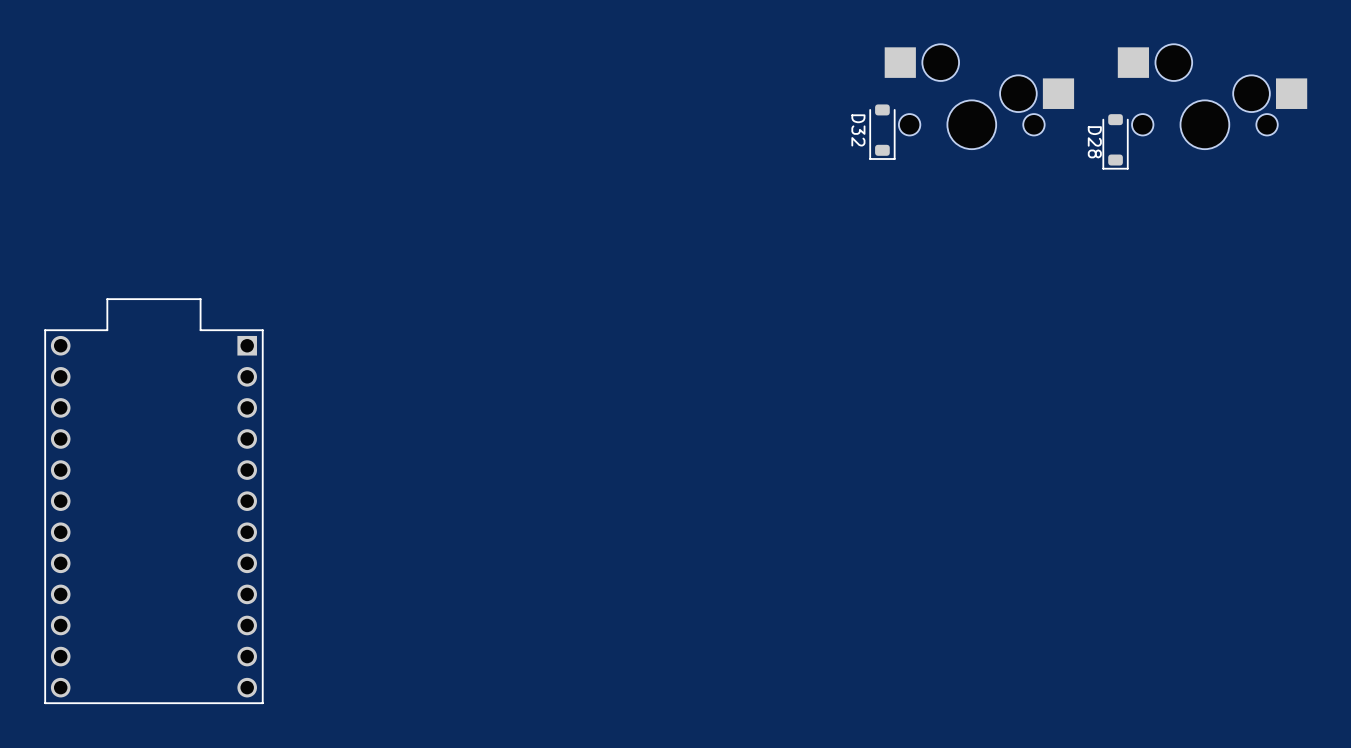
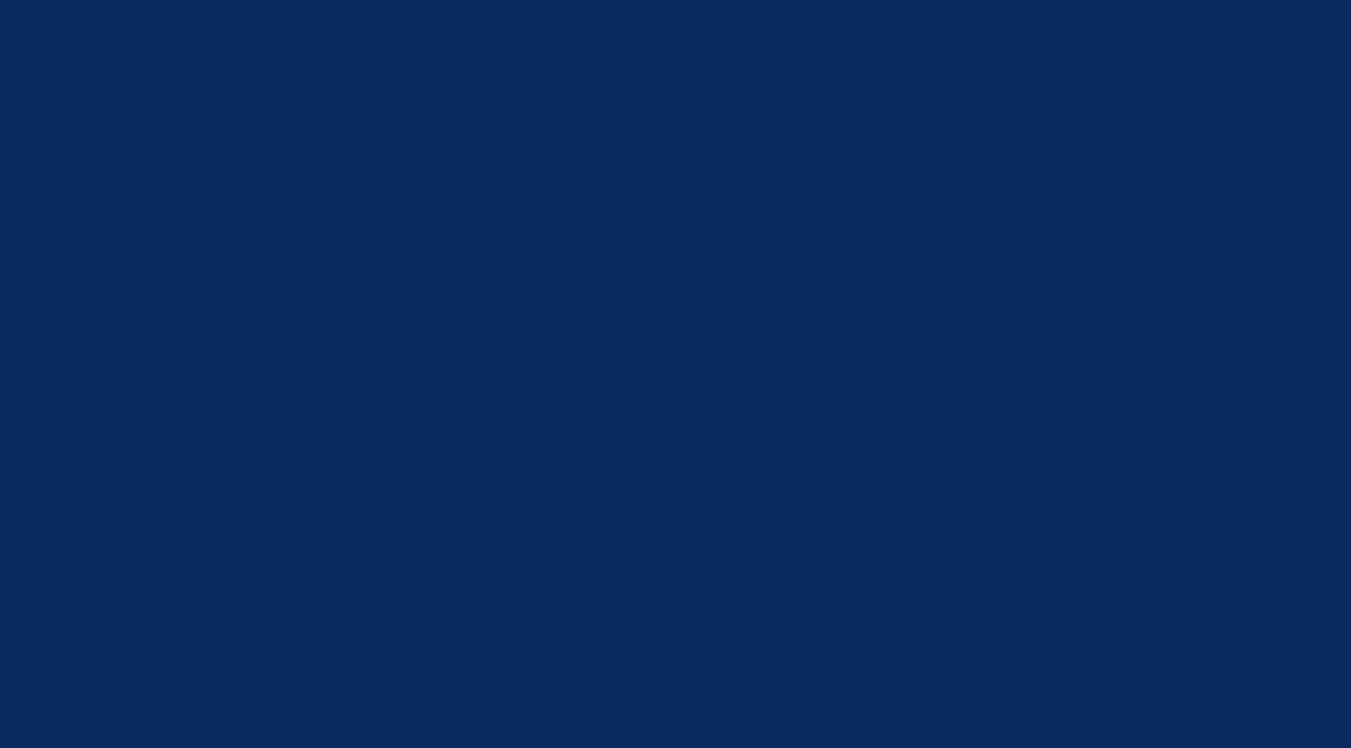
part: (979, 96) -> none
part: (1212, 96) -> none
D32: (882, 132) -> none
D28: (1115, 141) -> none
part: (153, 501) -> none

